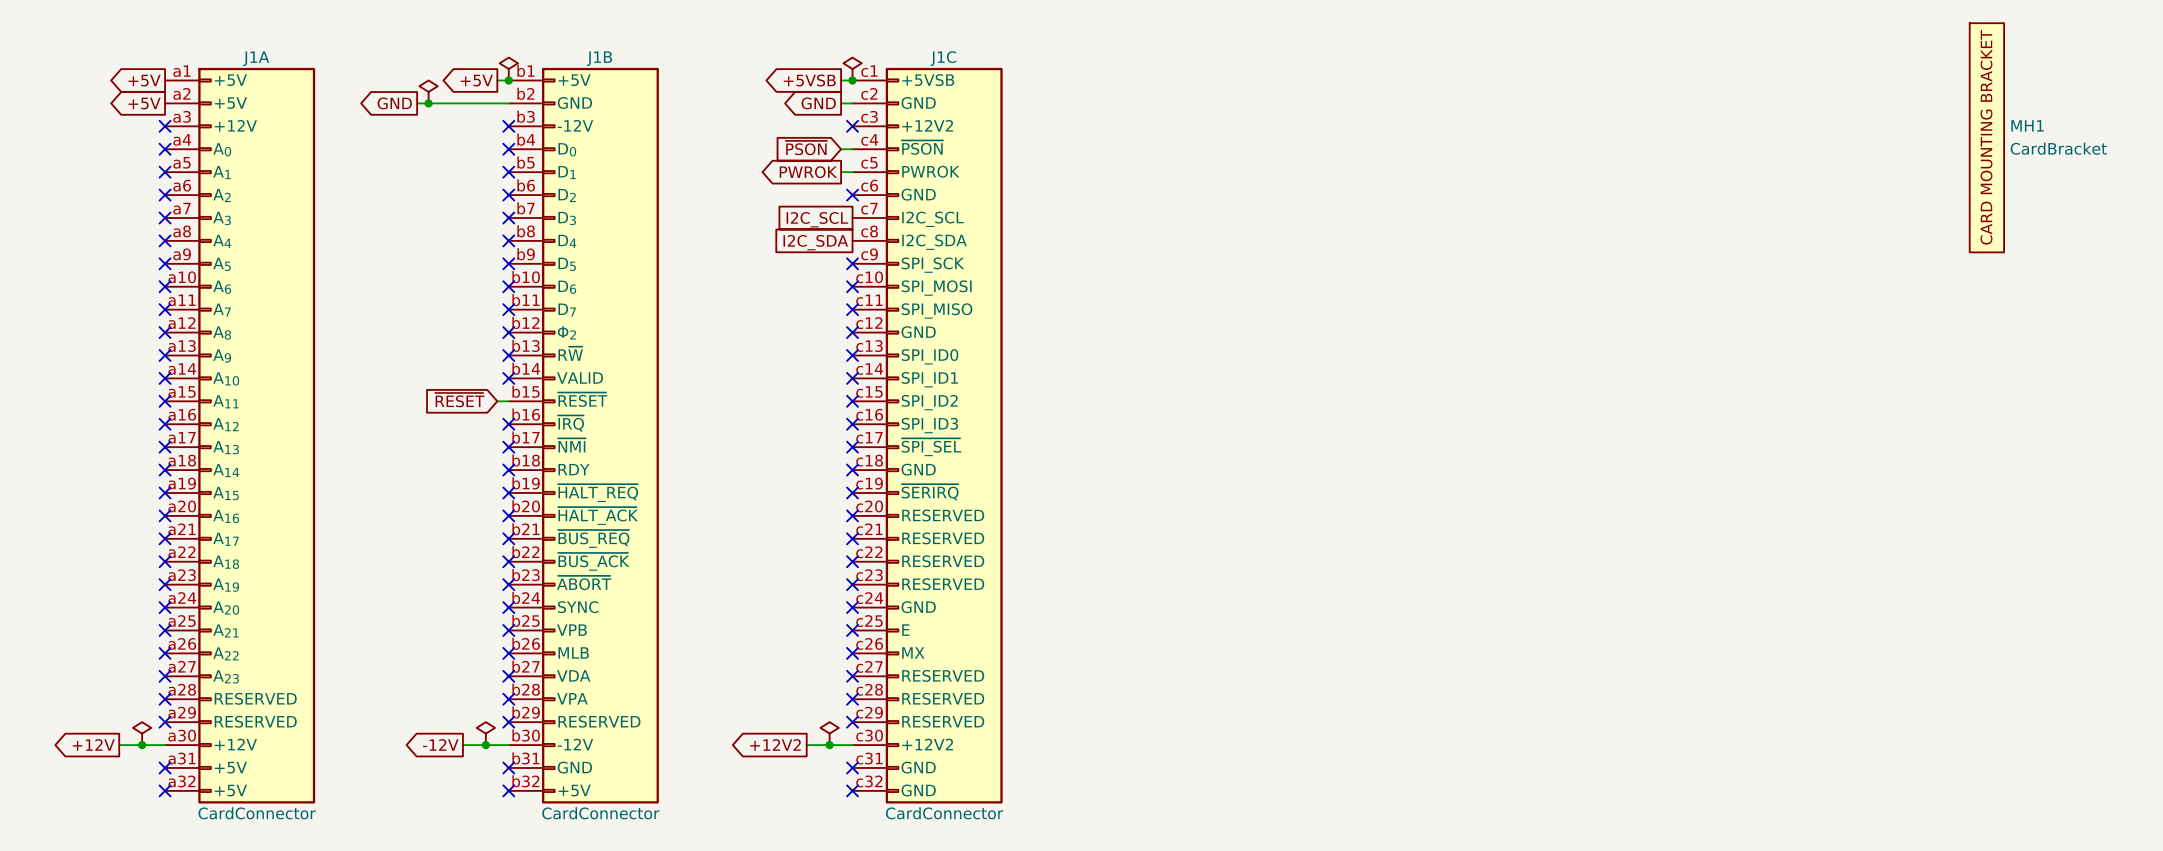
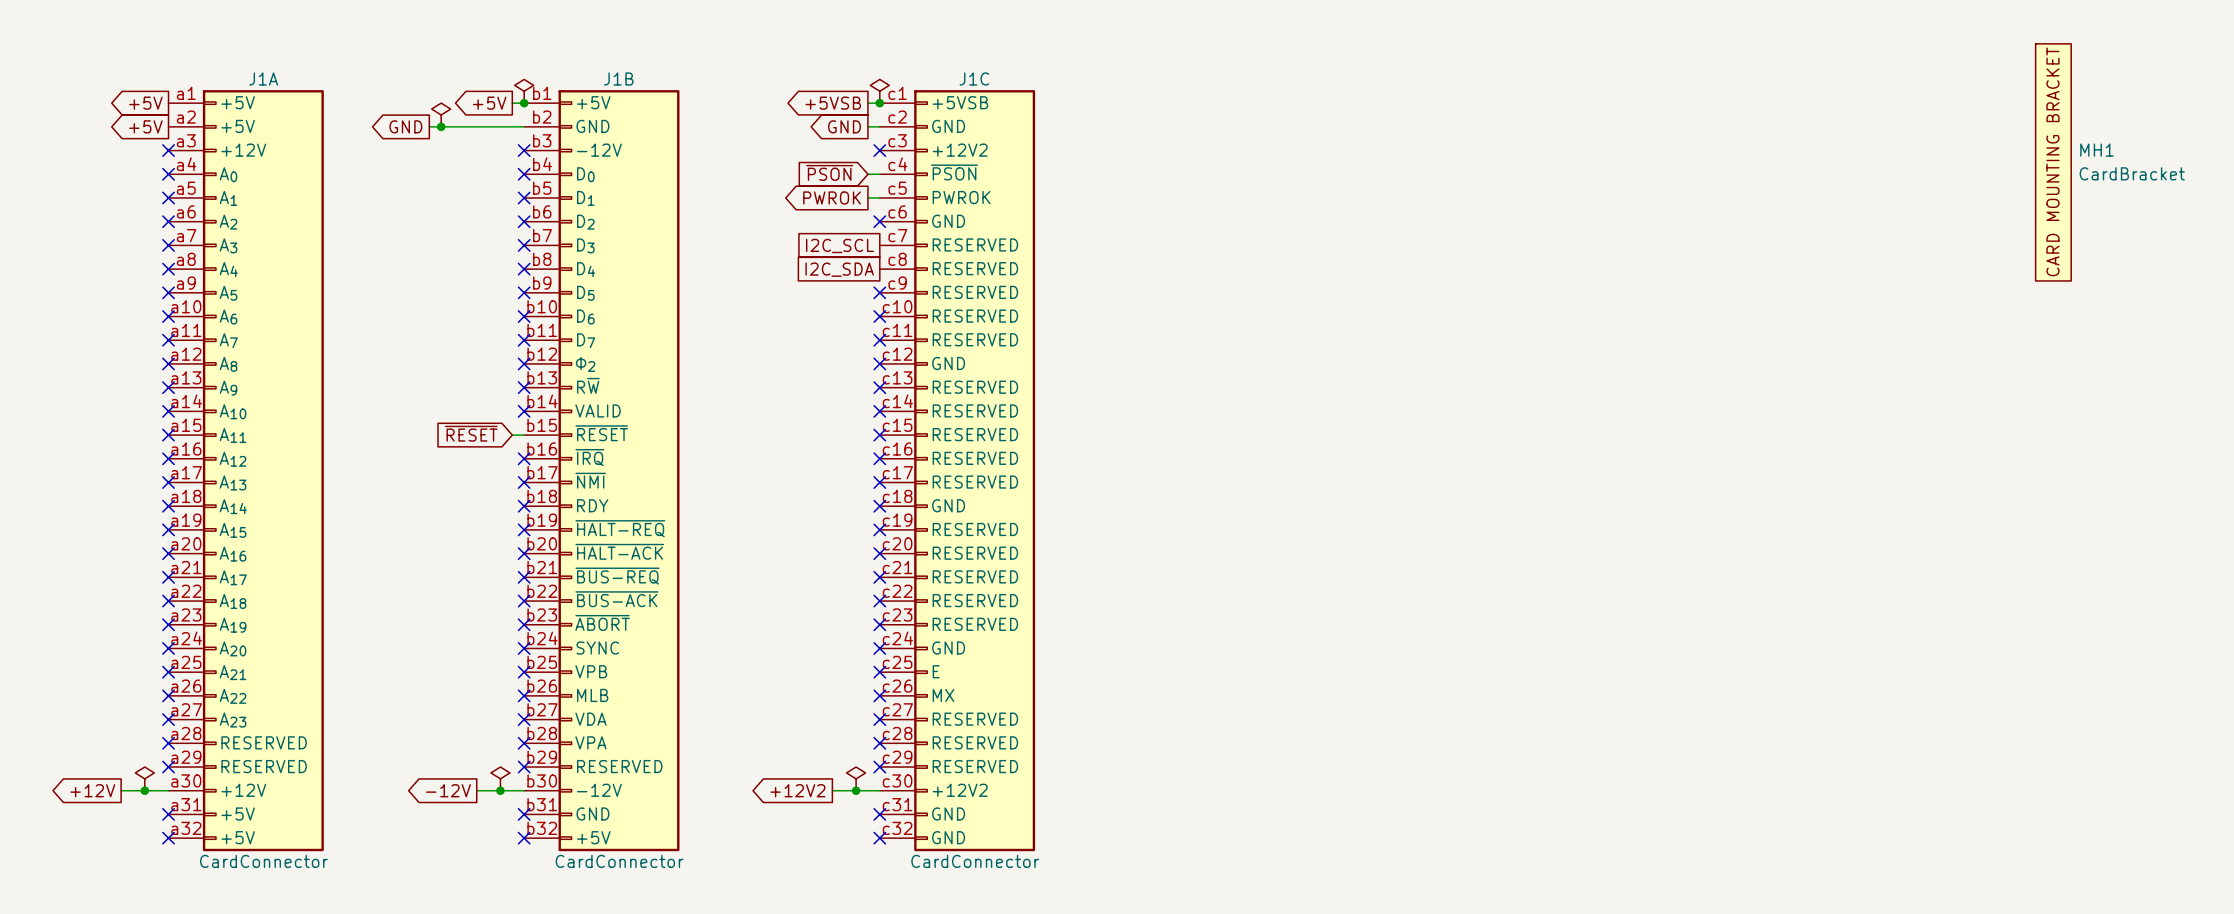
J1C symbol: [852, 67, 1003, 804] -> [879, 90, 1036, 852]
J1B pin name: ~{HALT_REQ} (598, 493) -> ~{HALT-REQ} (620, 528)
J1B pin name: ~{HALT_ACK} (598, 516) -> ~{HALT-ACK} (619, 551)
J1B pin name: ~{BUS_REQ} (593, 538) -> ~{BUS-REQ} (617, 576)
J1B pin name: ~{BUS_ACK} (593, 561) -> ~{BUS-ACK} (616, 599)

